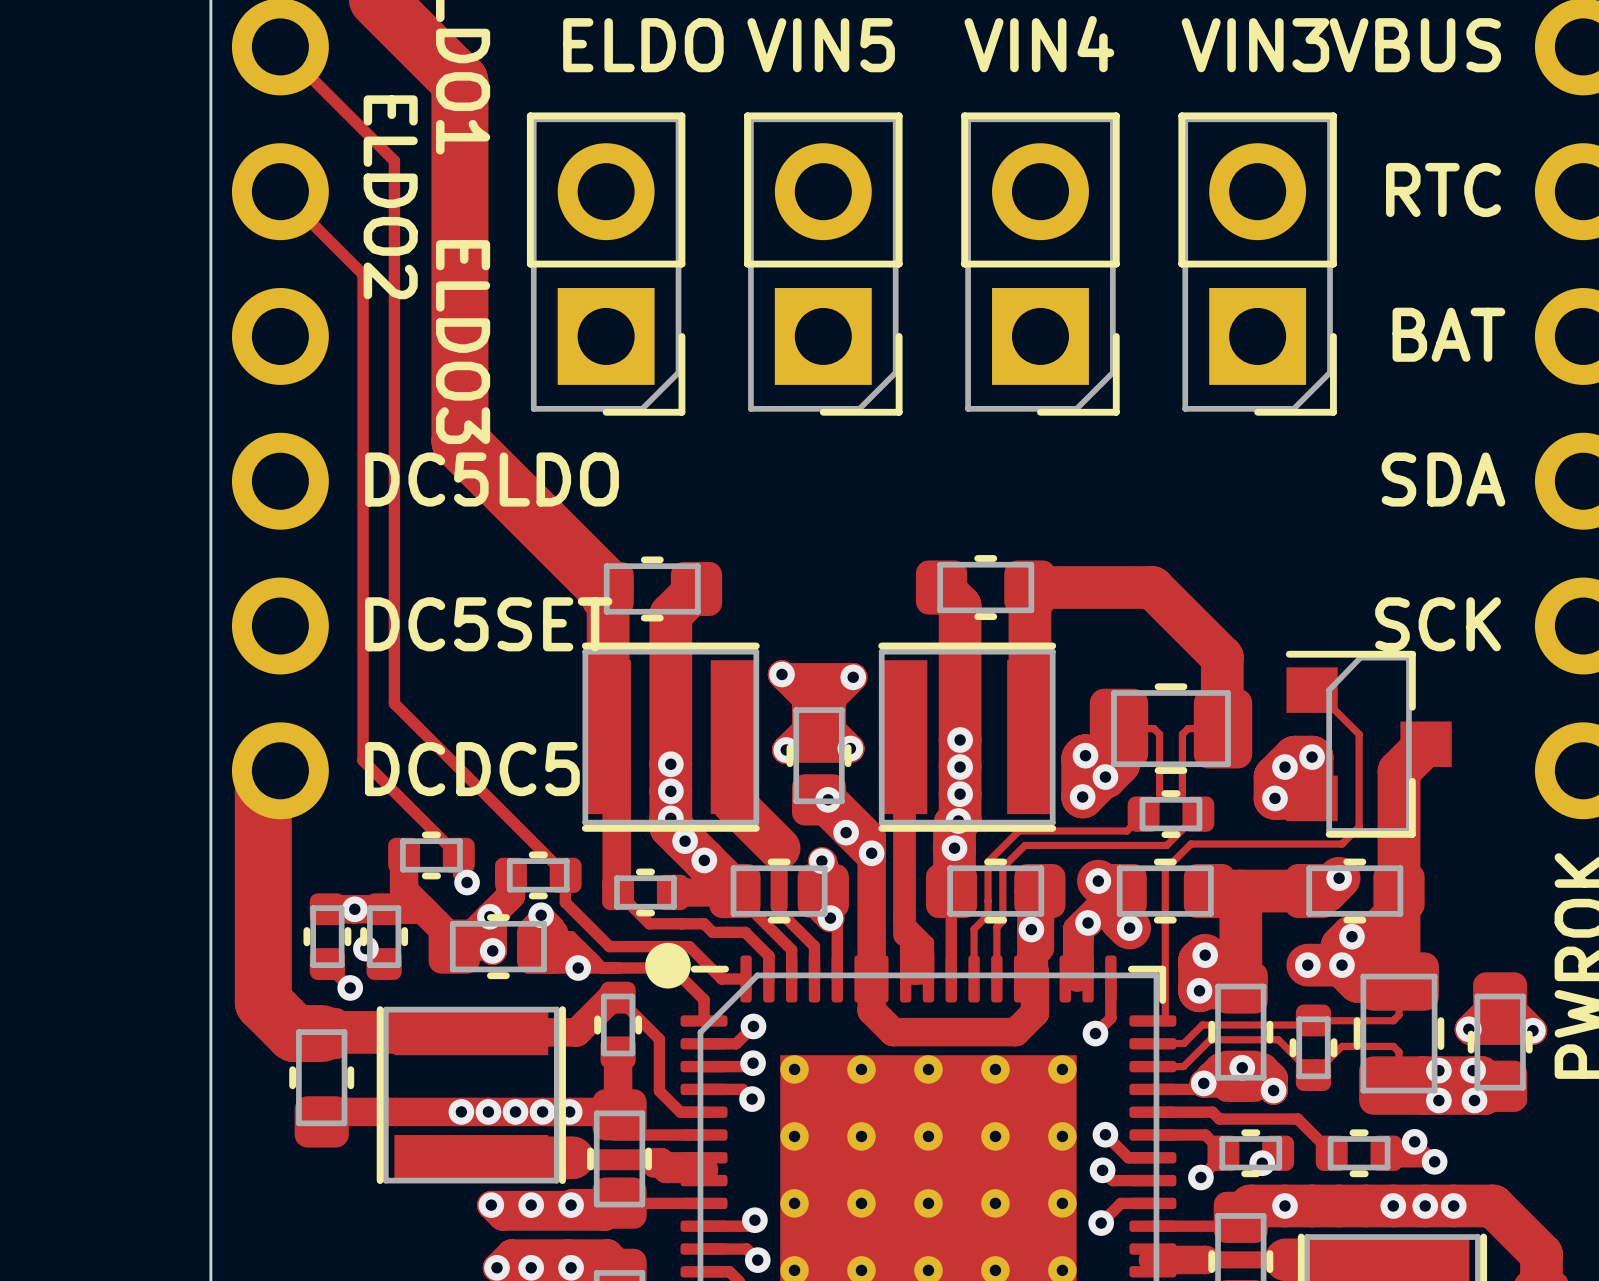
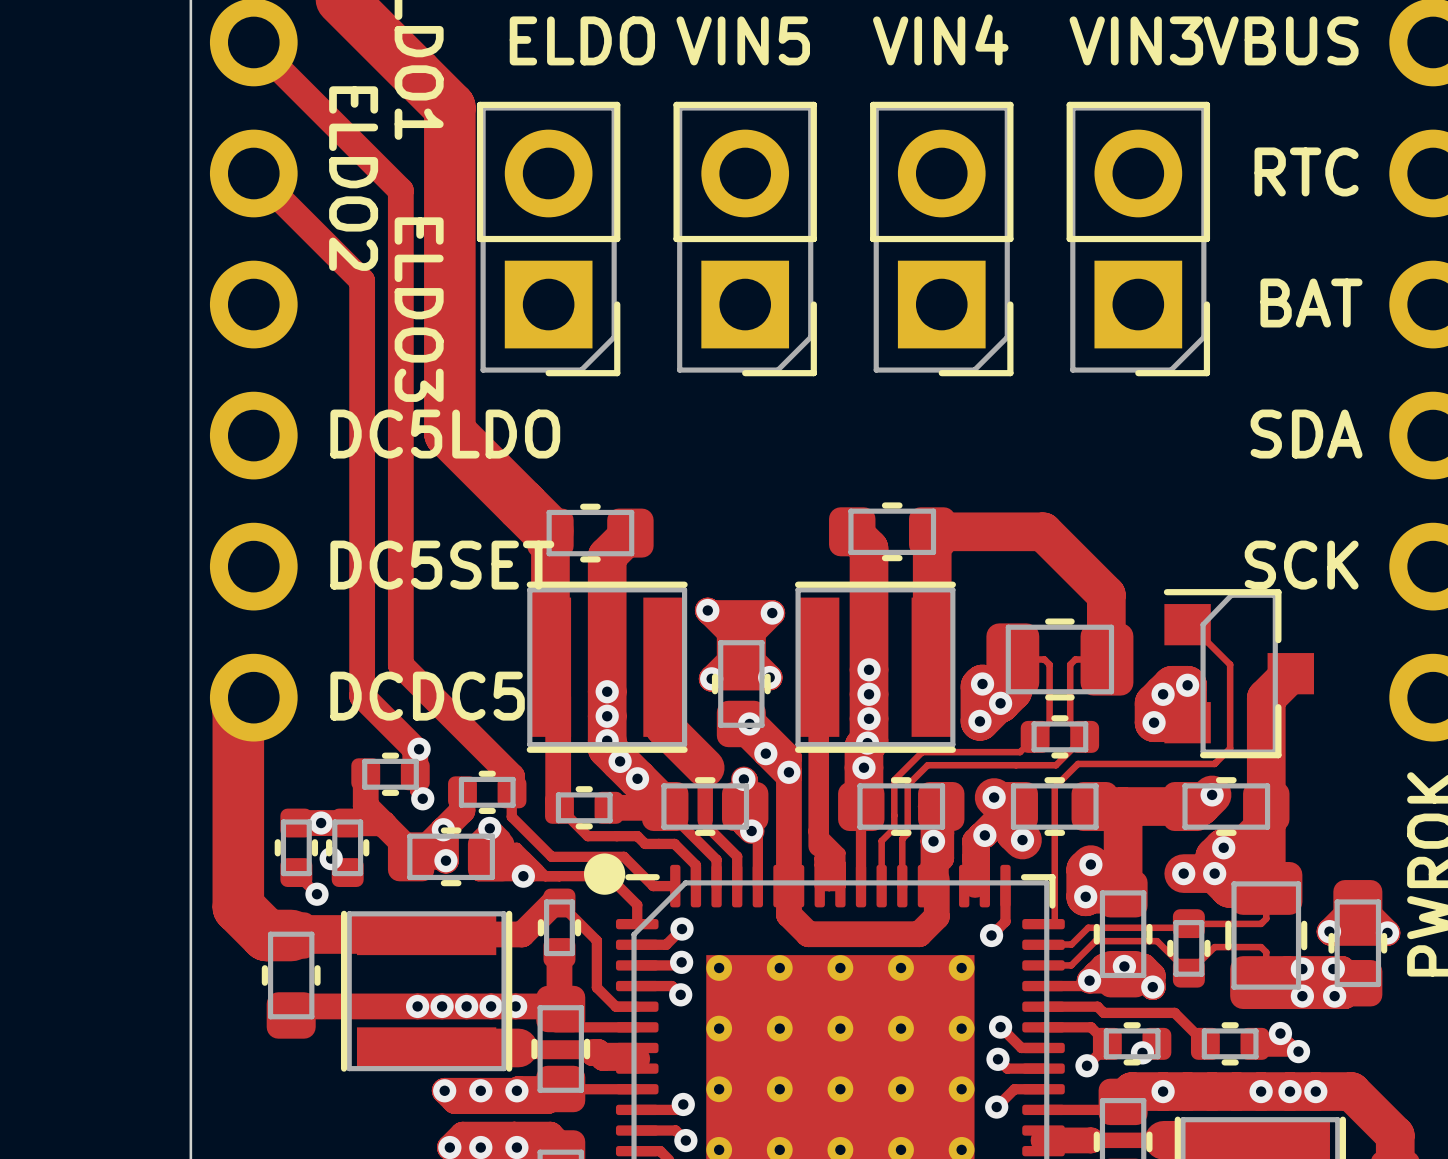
track: (280, 46) (394, 160) (394, 703) (565, 874) -> (253, 43) (400, 190) (400, 665) (512, 776) (512, 792)
track: (459, 81) (459, 441) (496, 478) -> (416, 73) (449, 107) (449, 433)
track: (280, 191) (363, 274) (363, 760) (459, 857) -> (253, 172) (362, 280) (362, 696) (415, 749) (415, 774)
via: none -> (419, 749)

